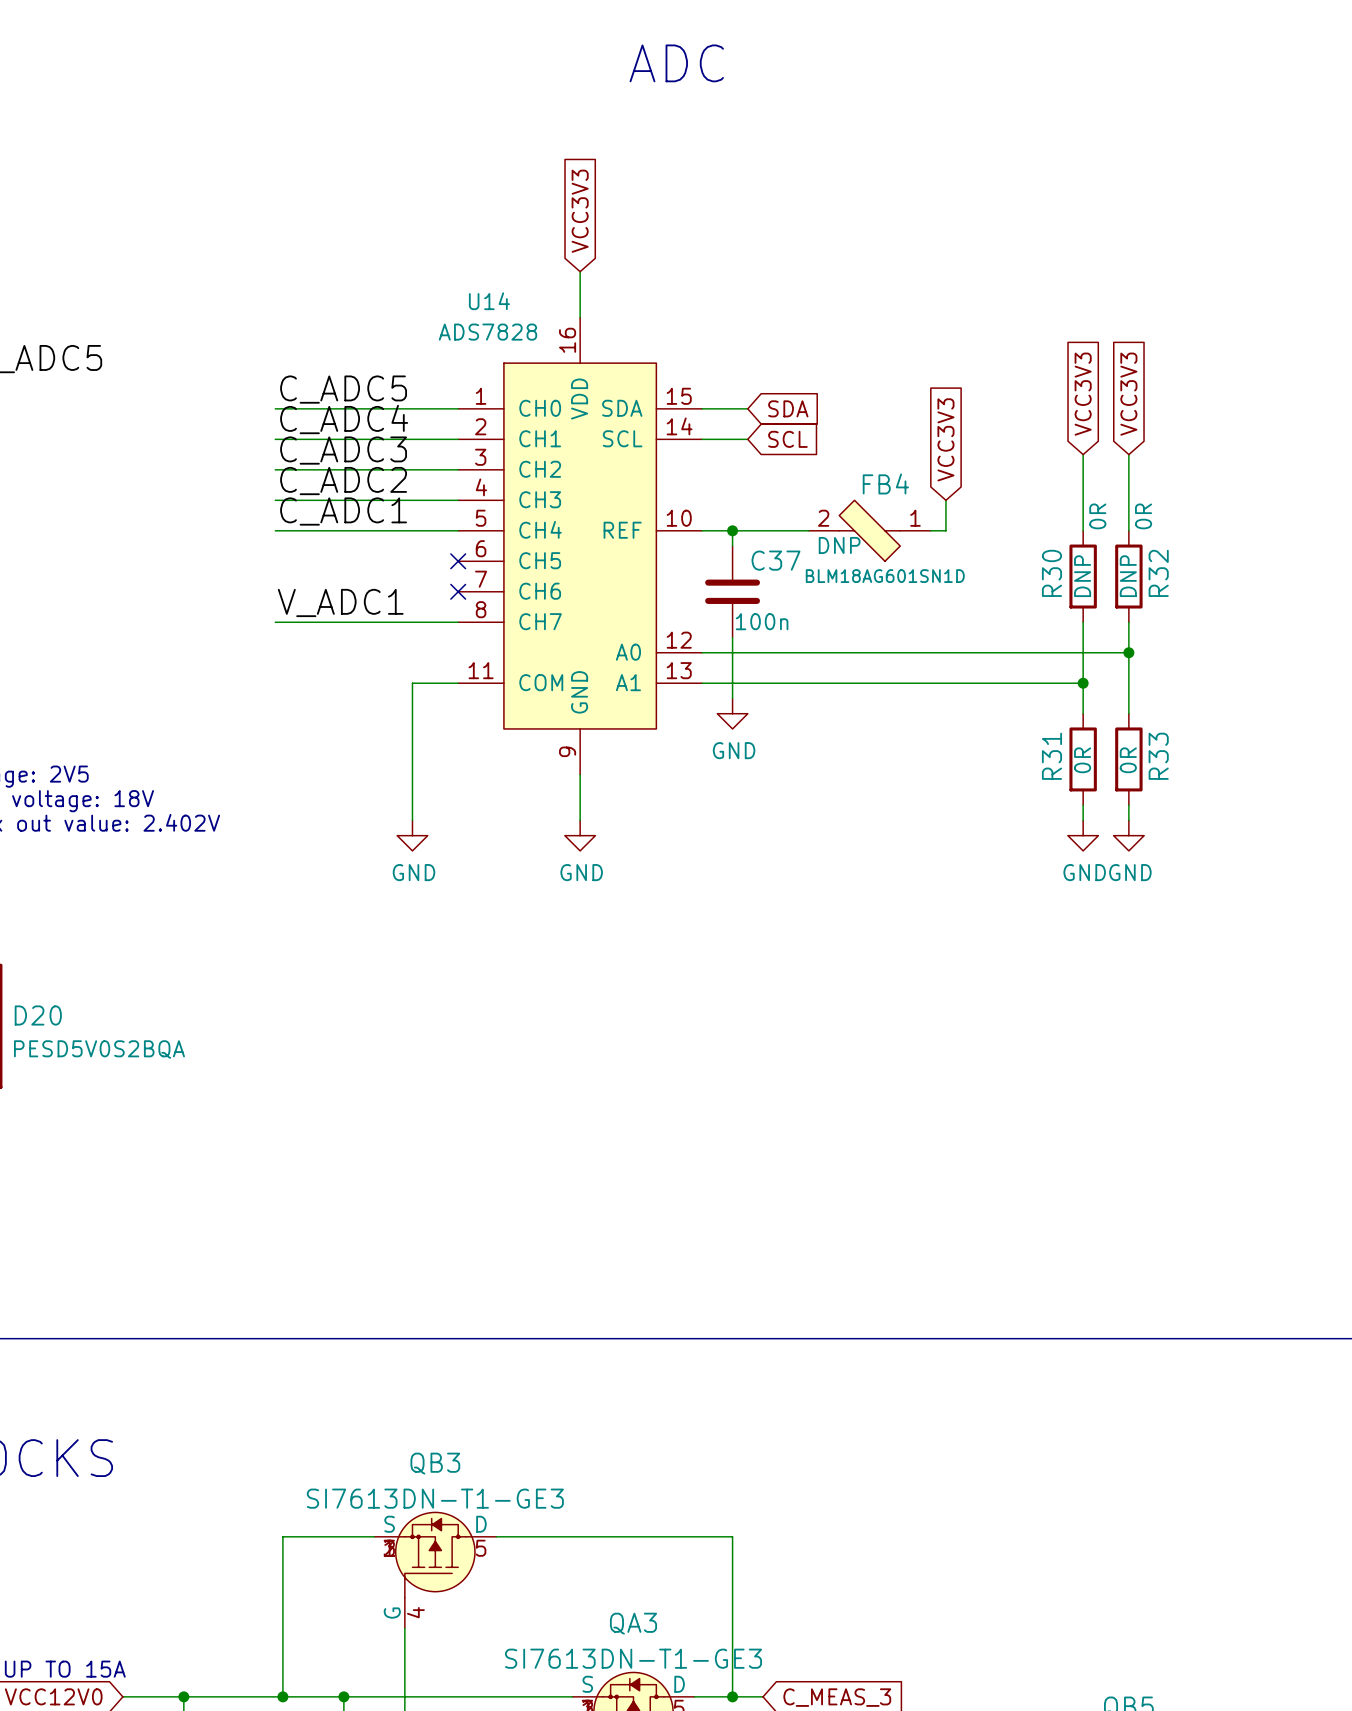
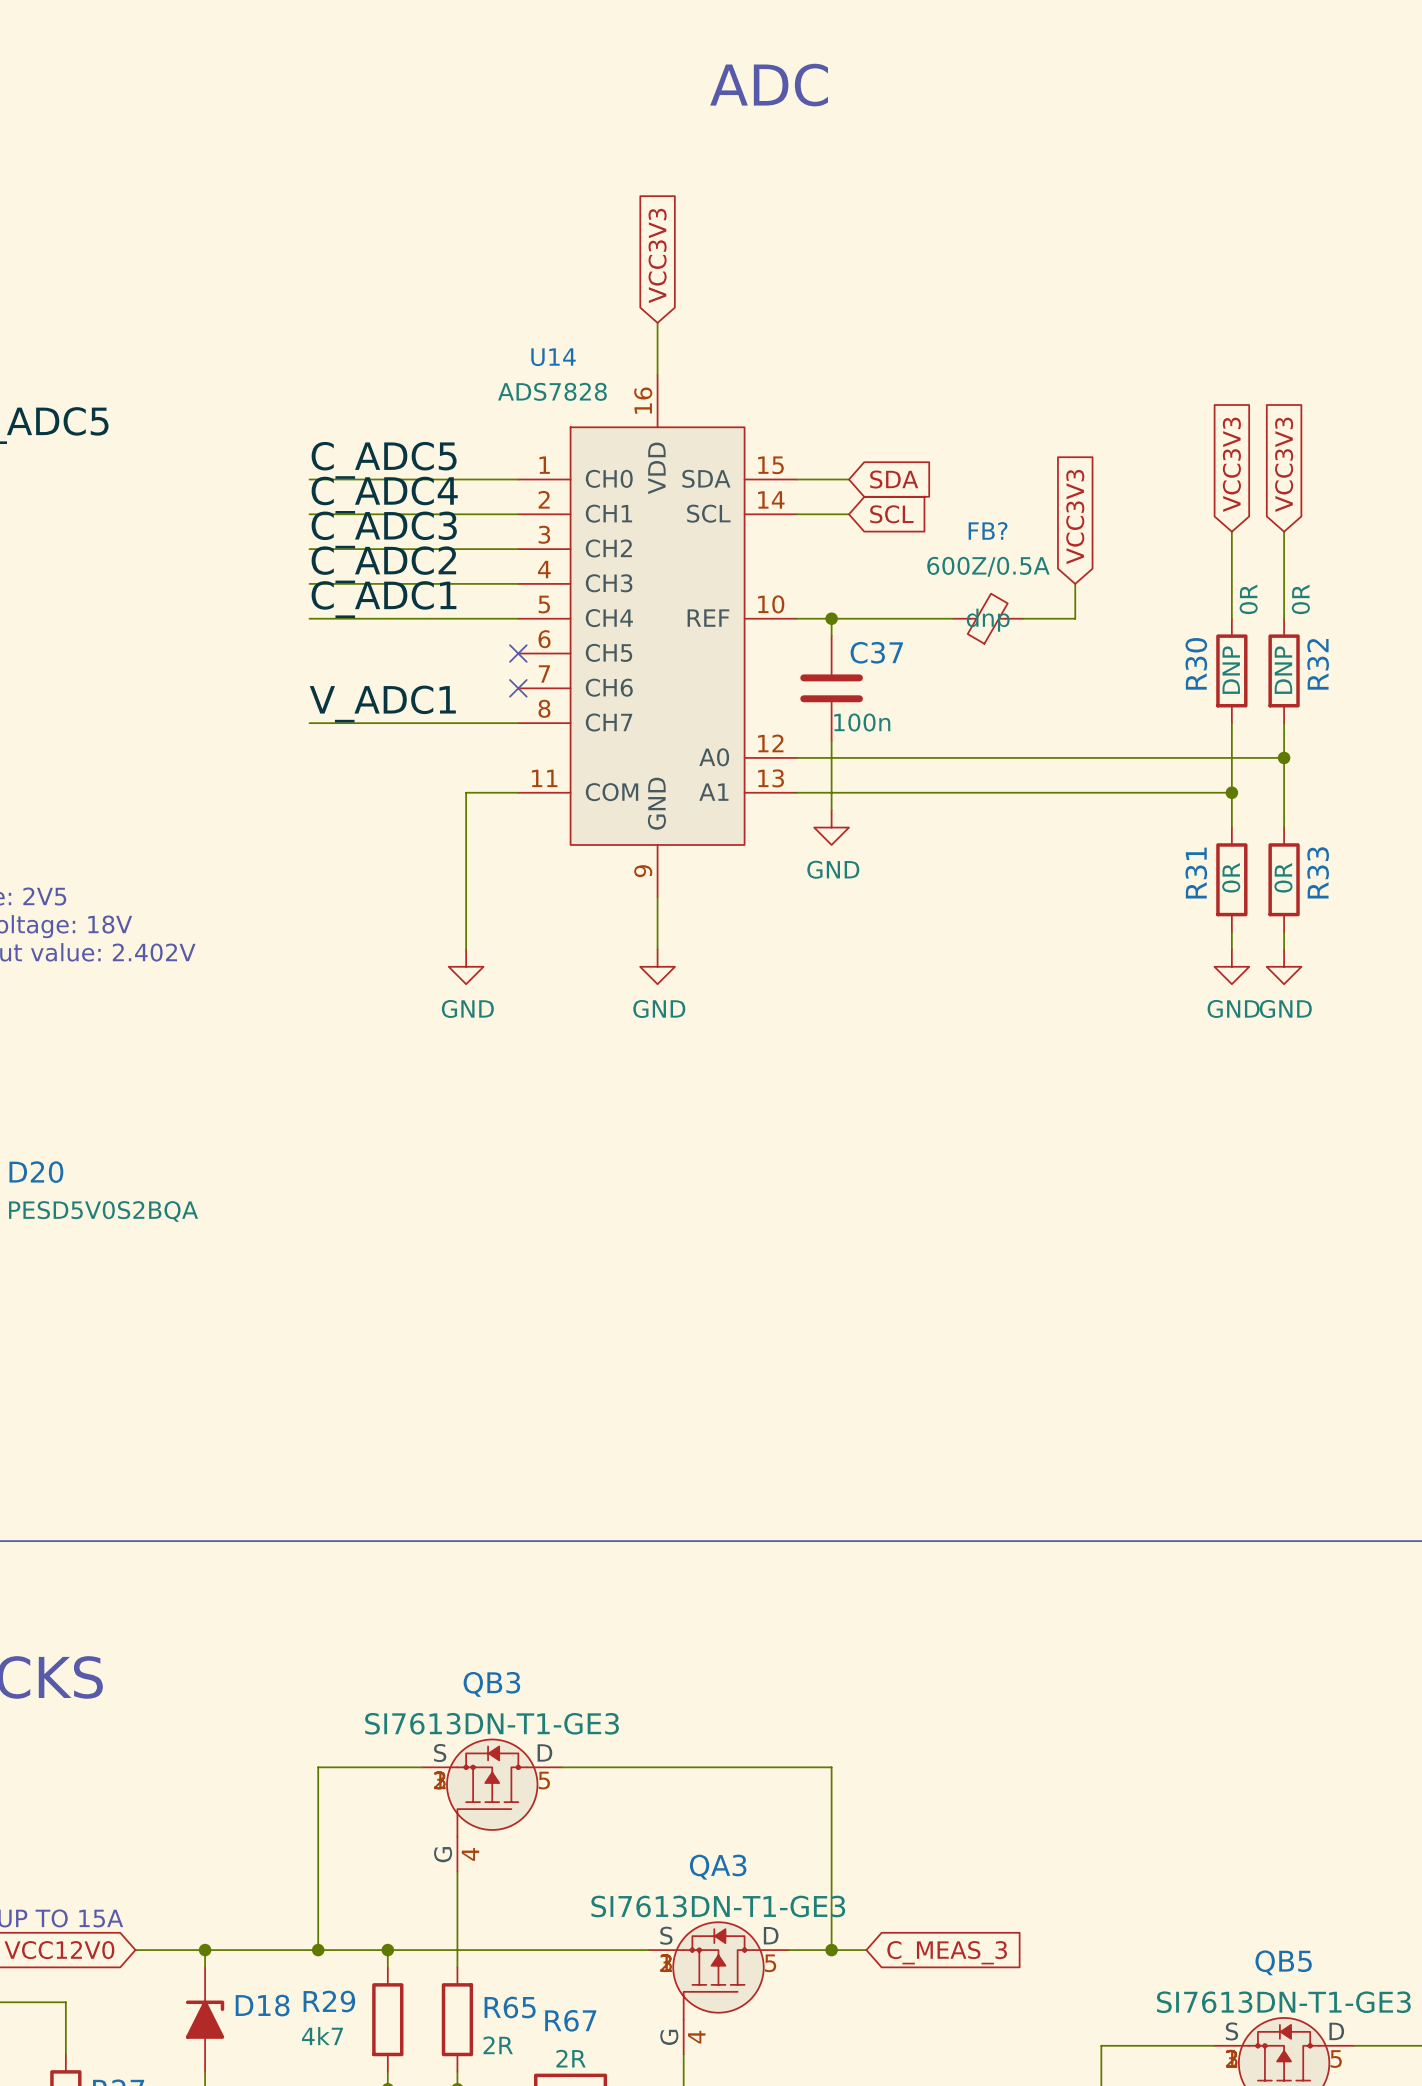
FB4: BLM18AG601SN1D (869, 530) -> none
FB?: none -> (988, 618)

